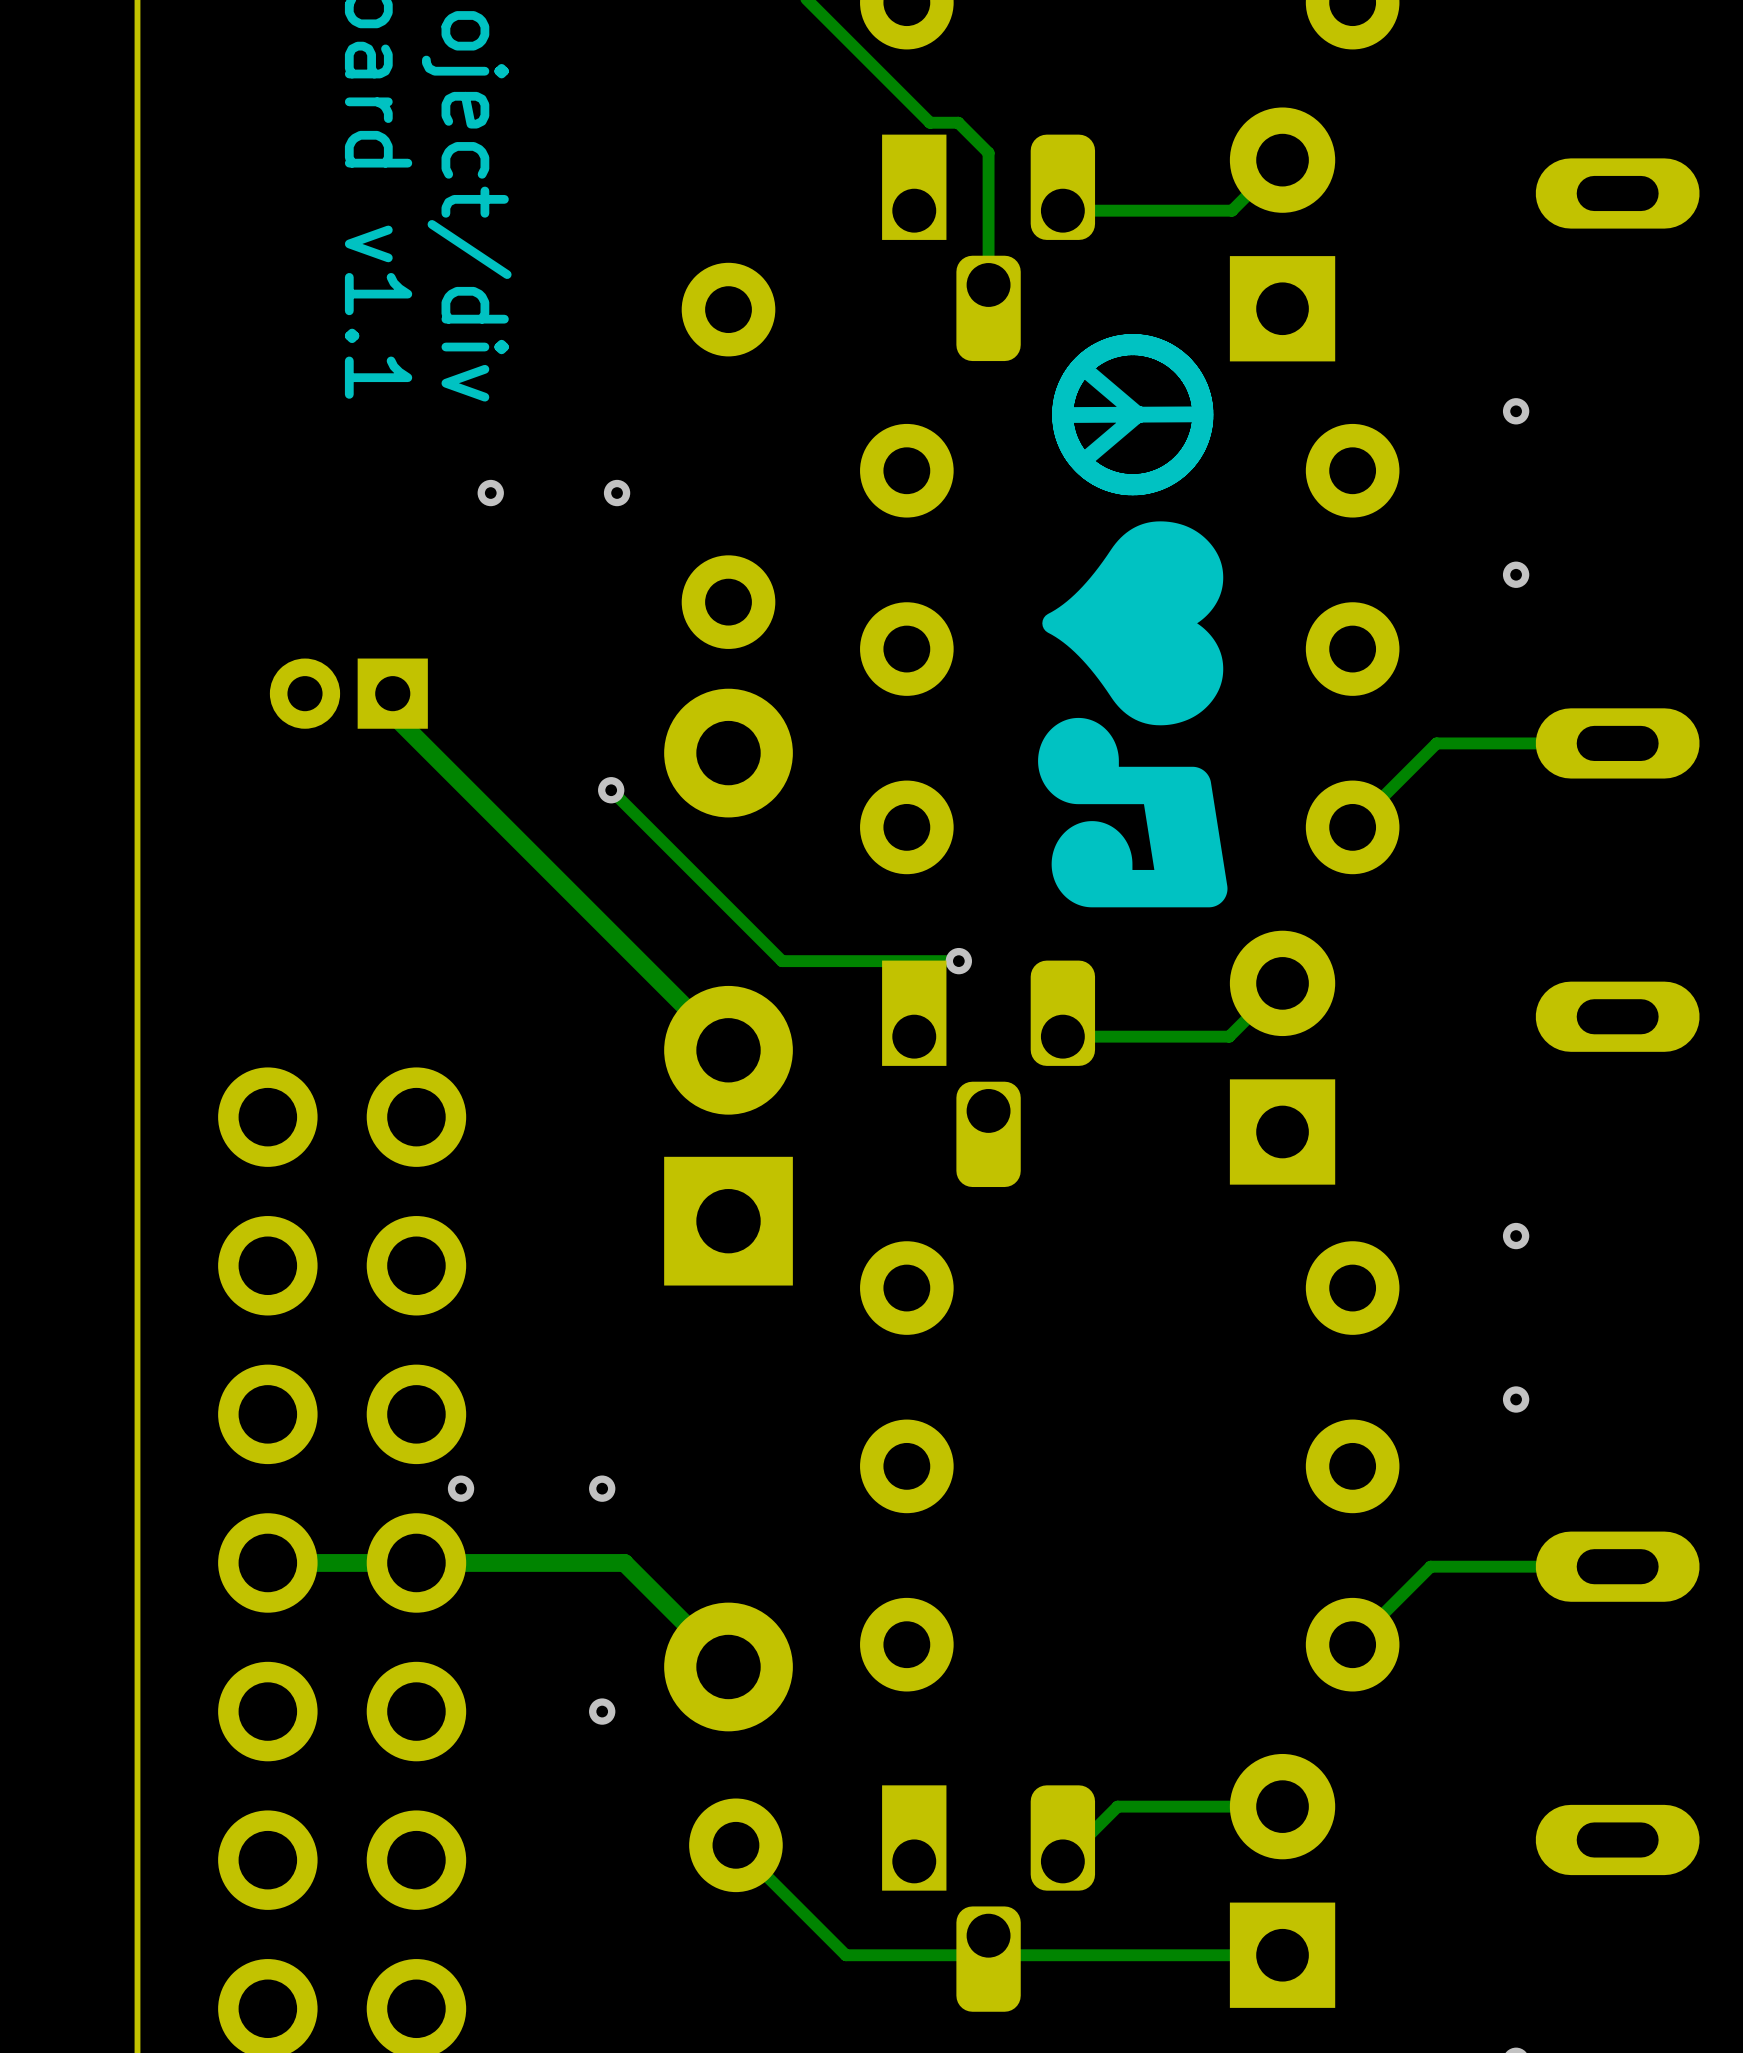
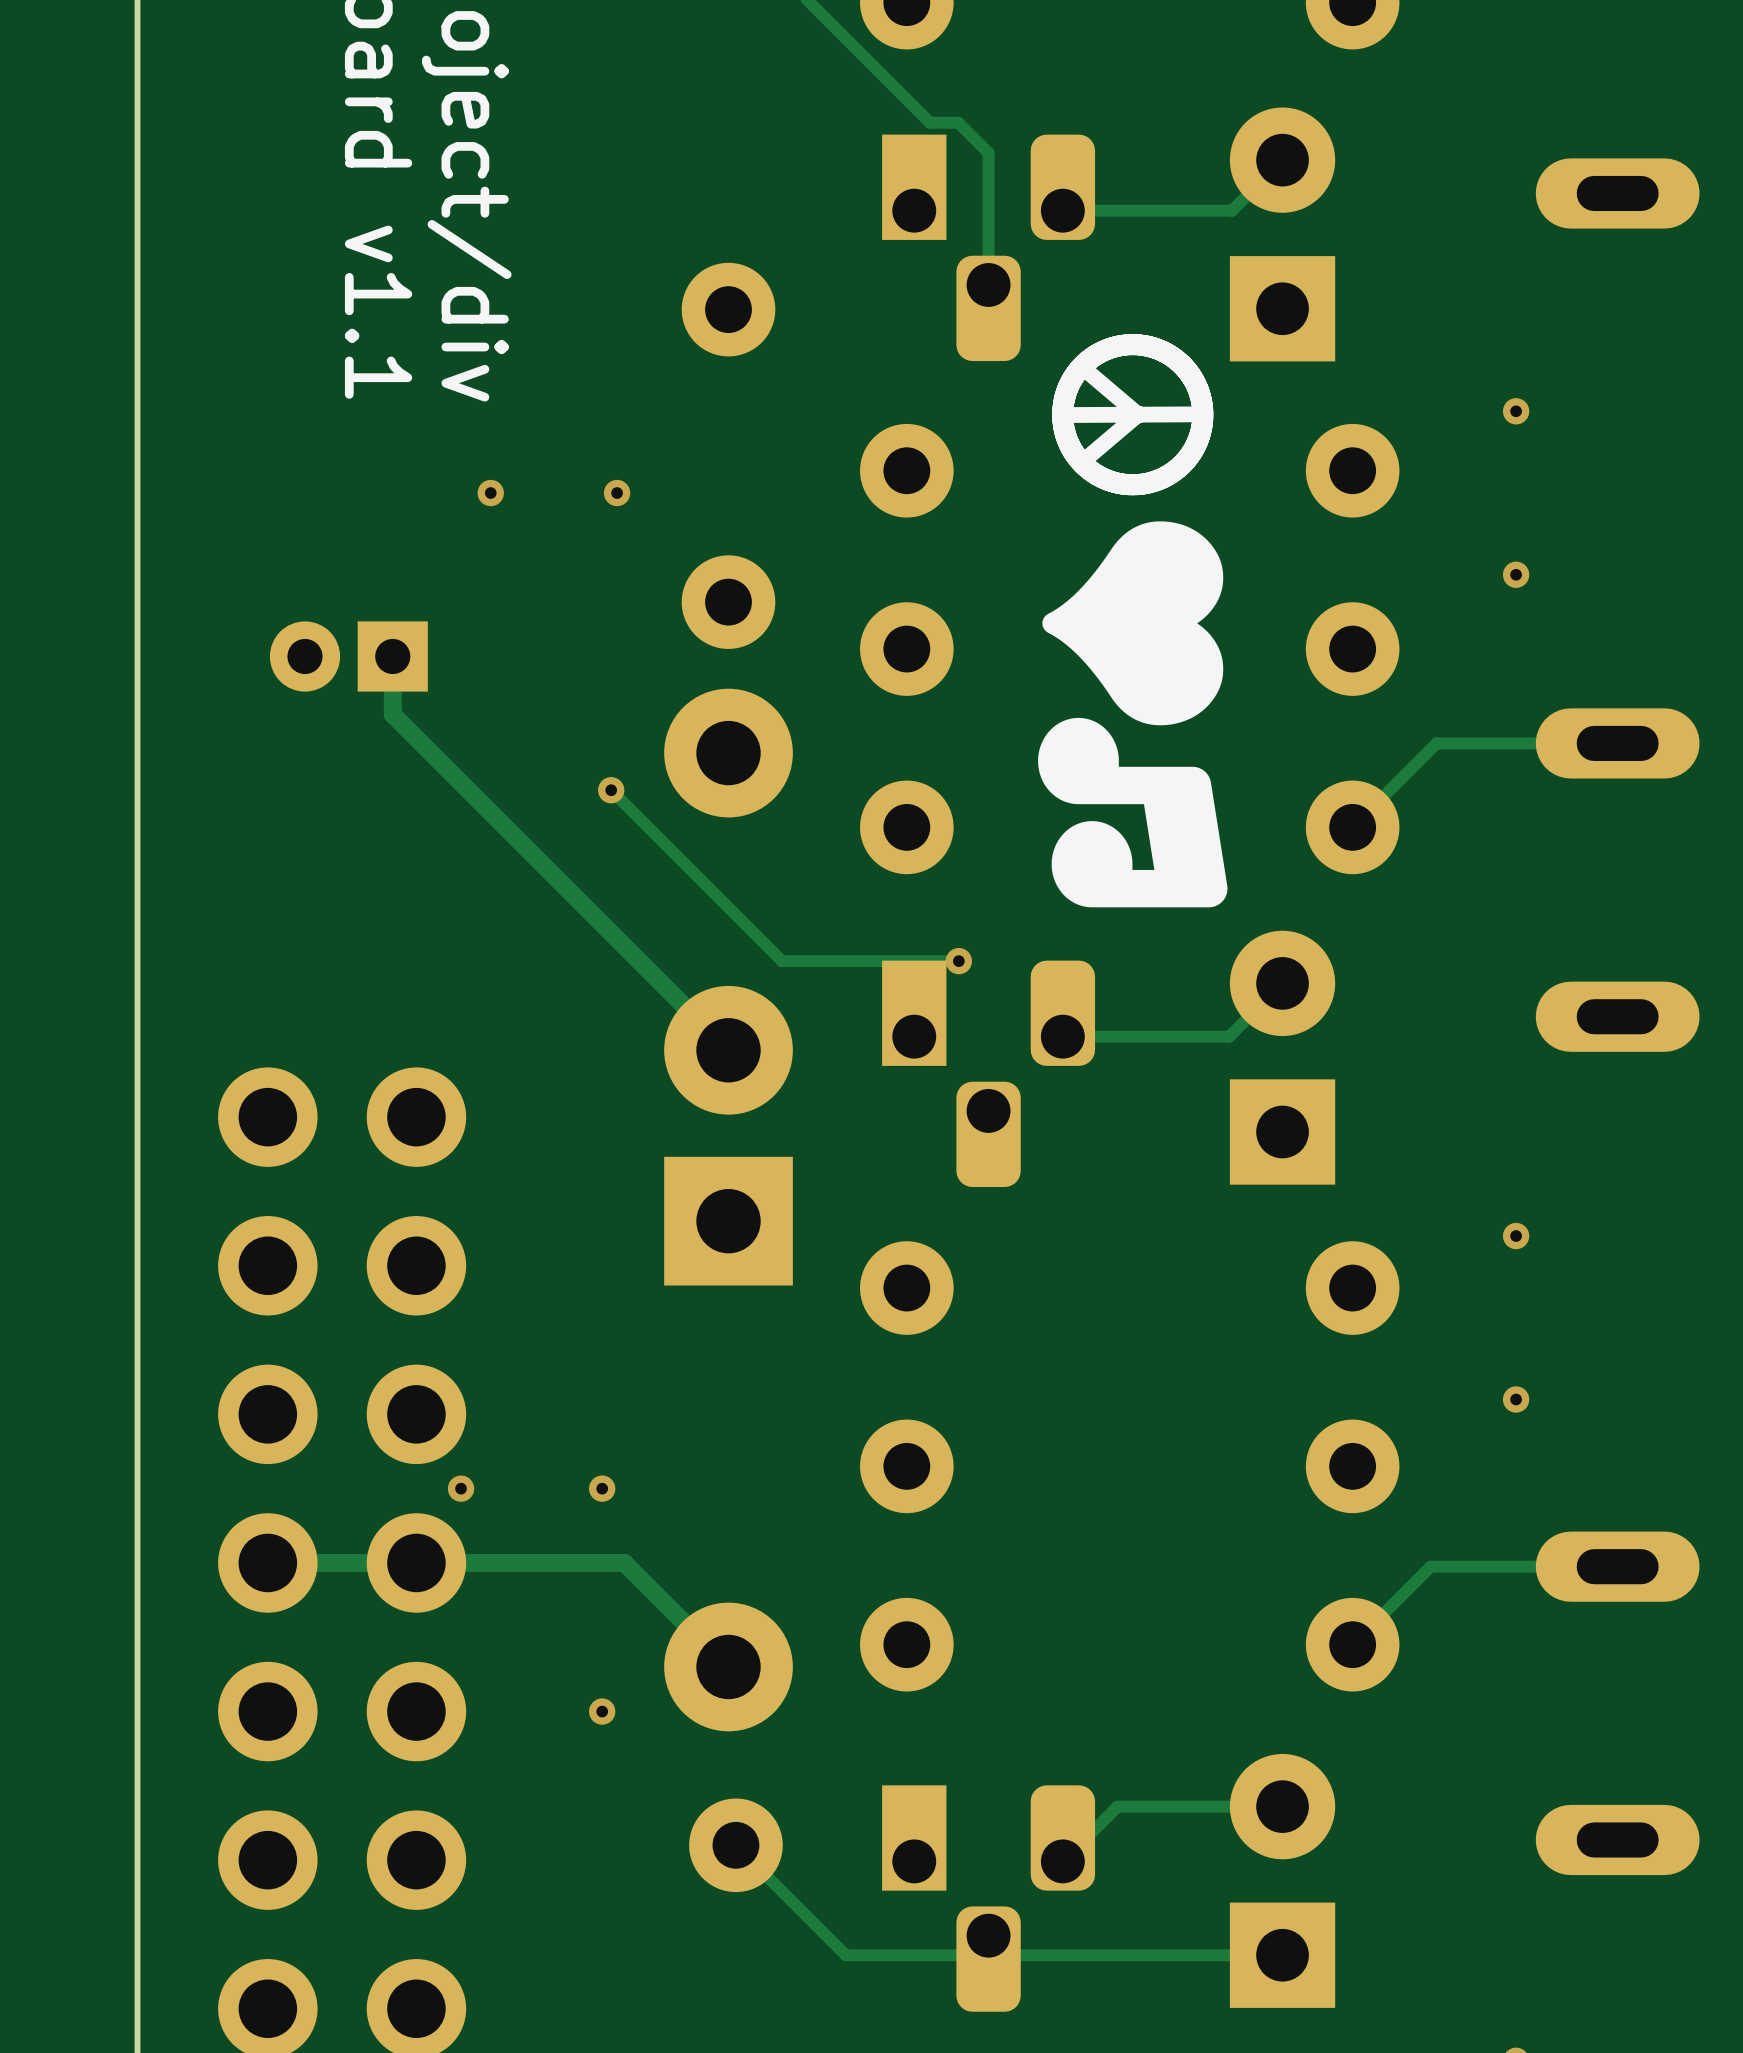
part position: (348, 693) -> (348, 656)

